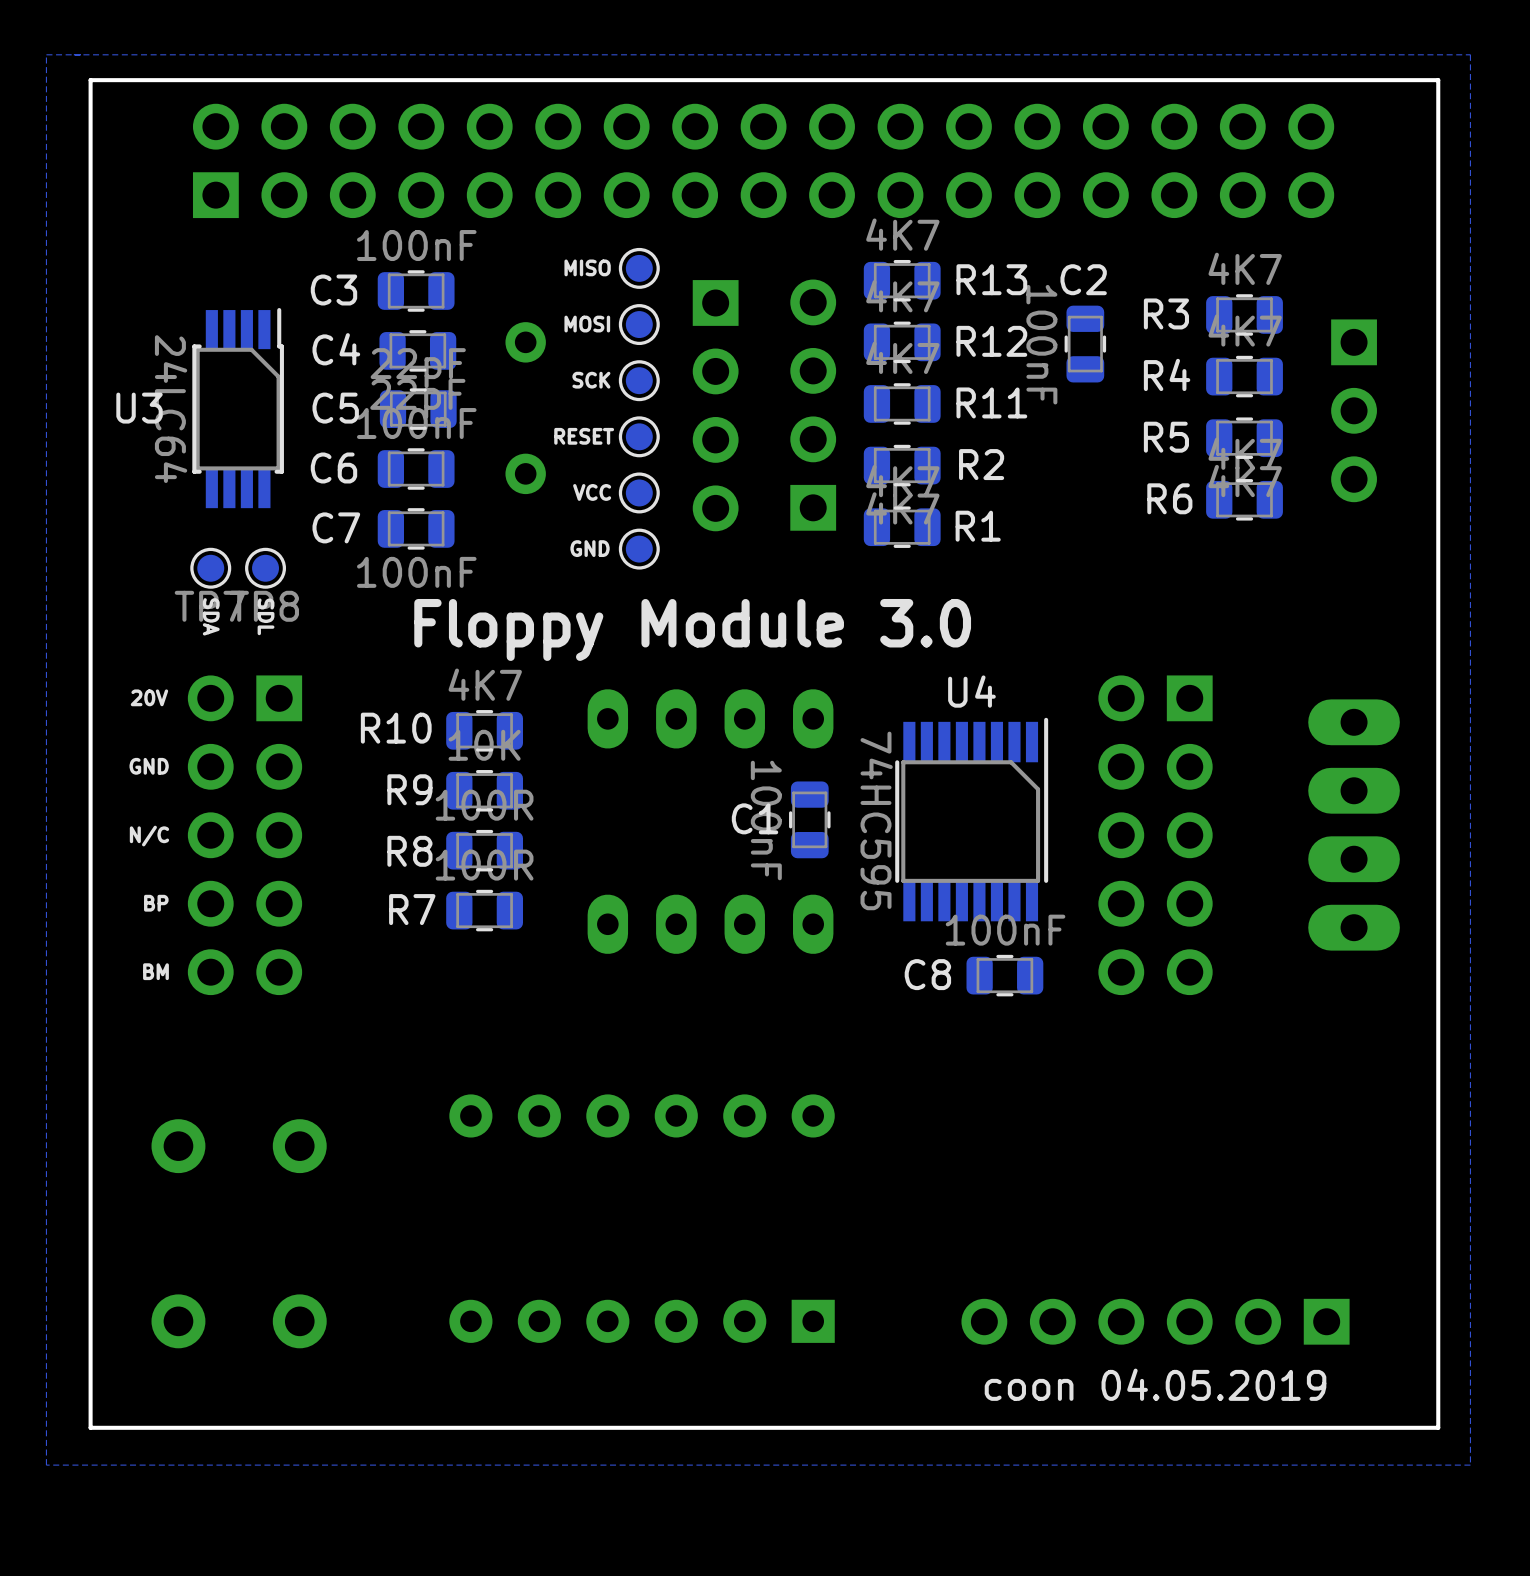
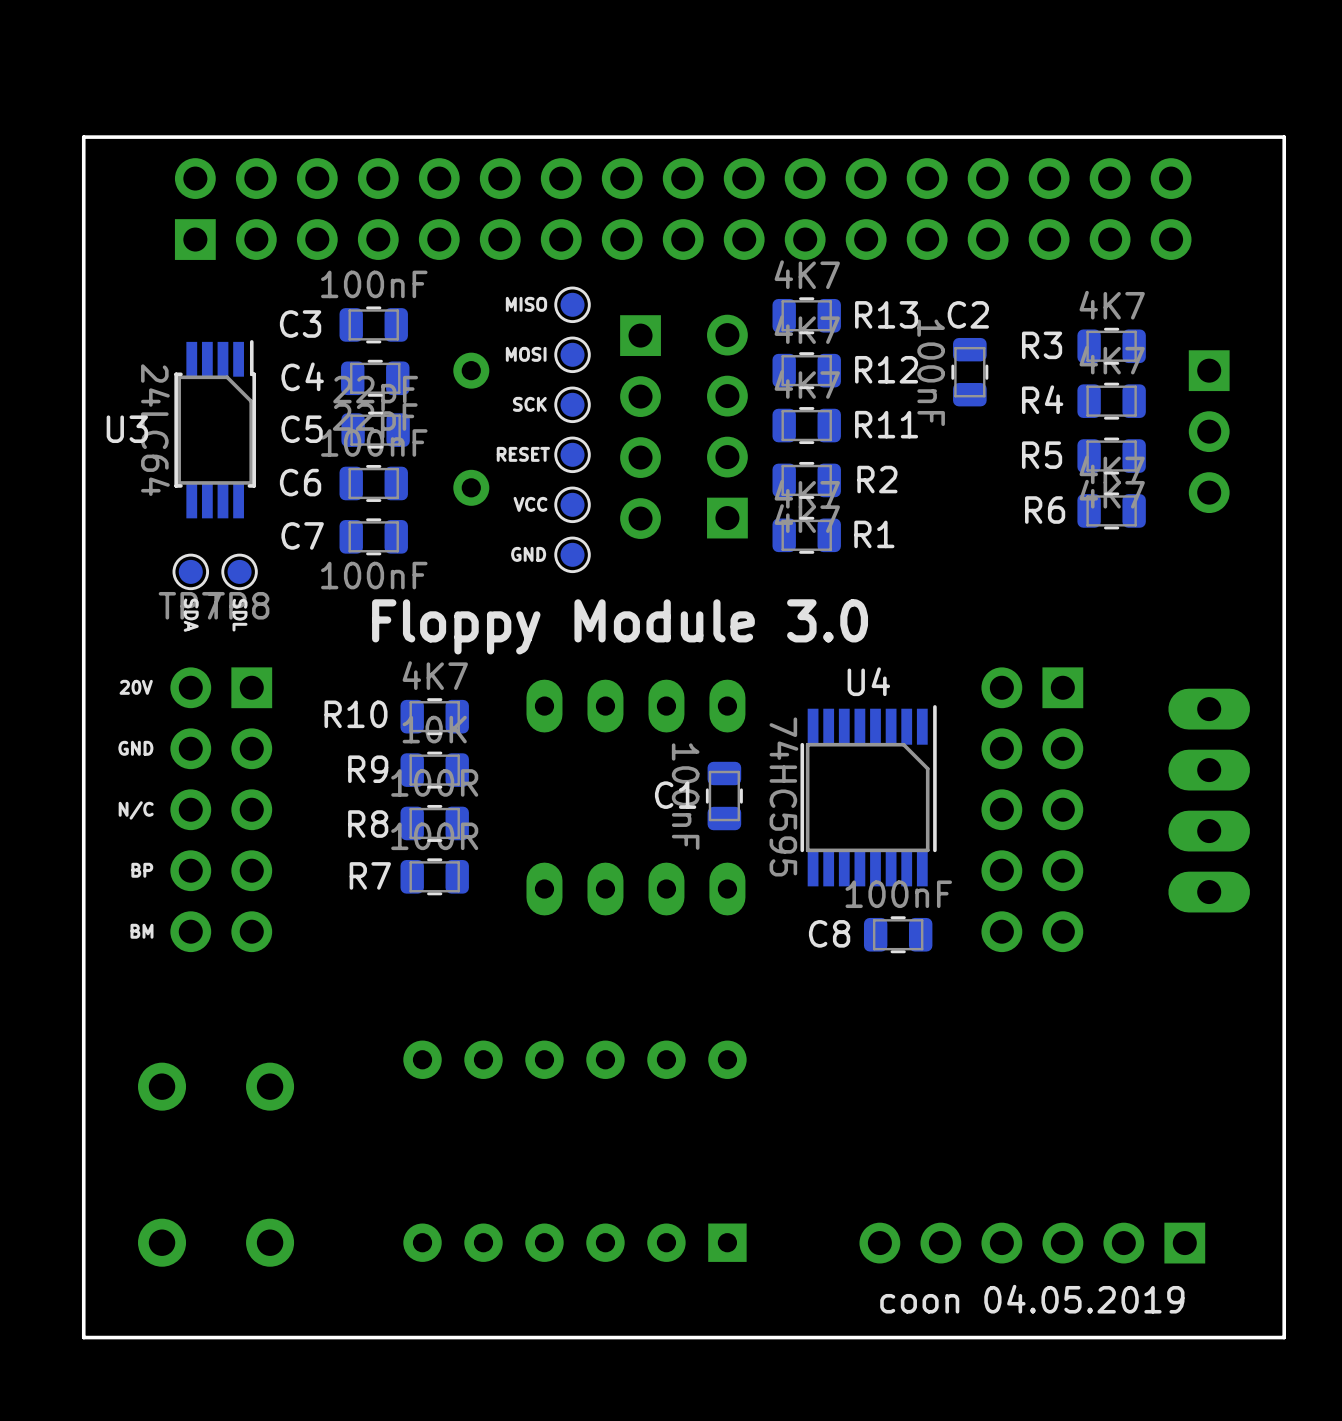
zone outline: (1470, 54) (46, 54) (46, 1465) (1470, 1465) (1470, 54) -> none

